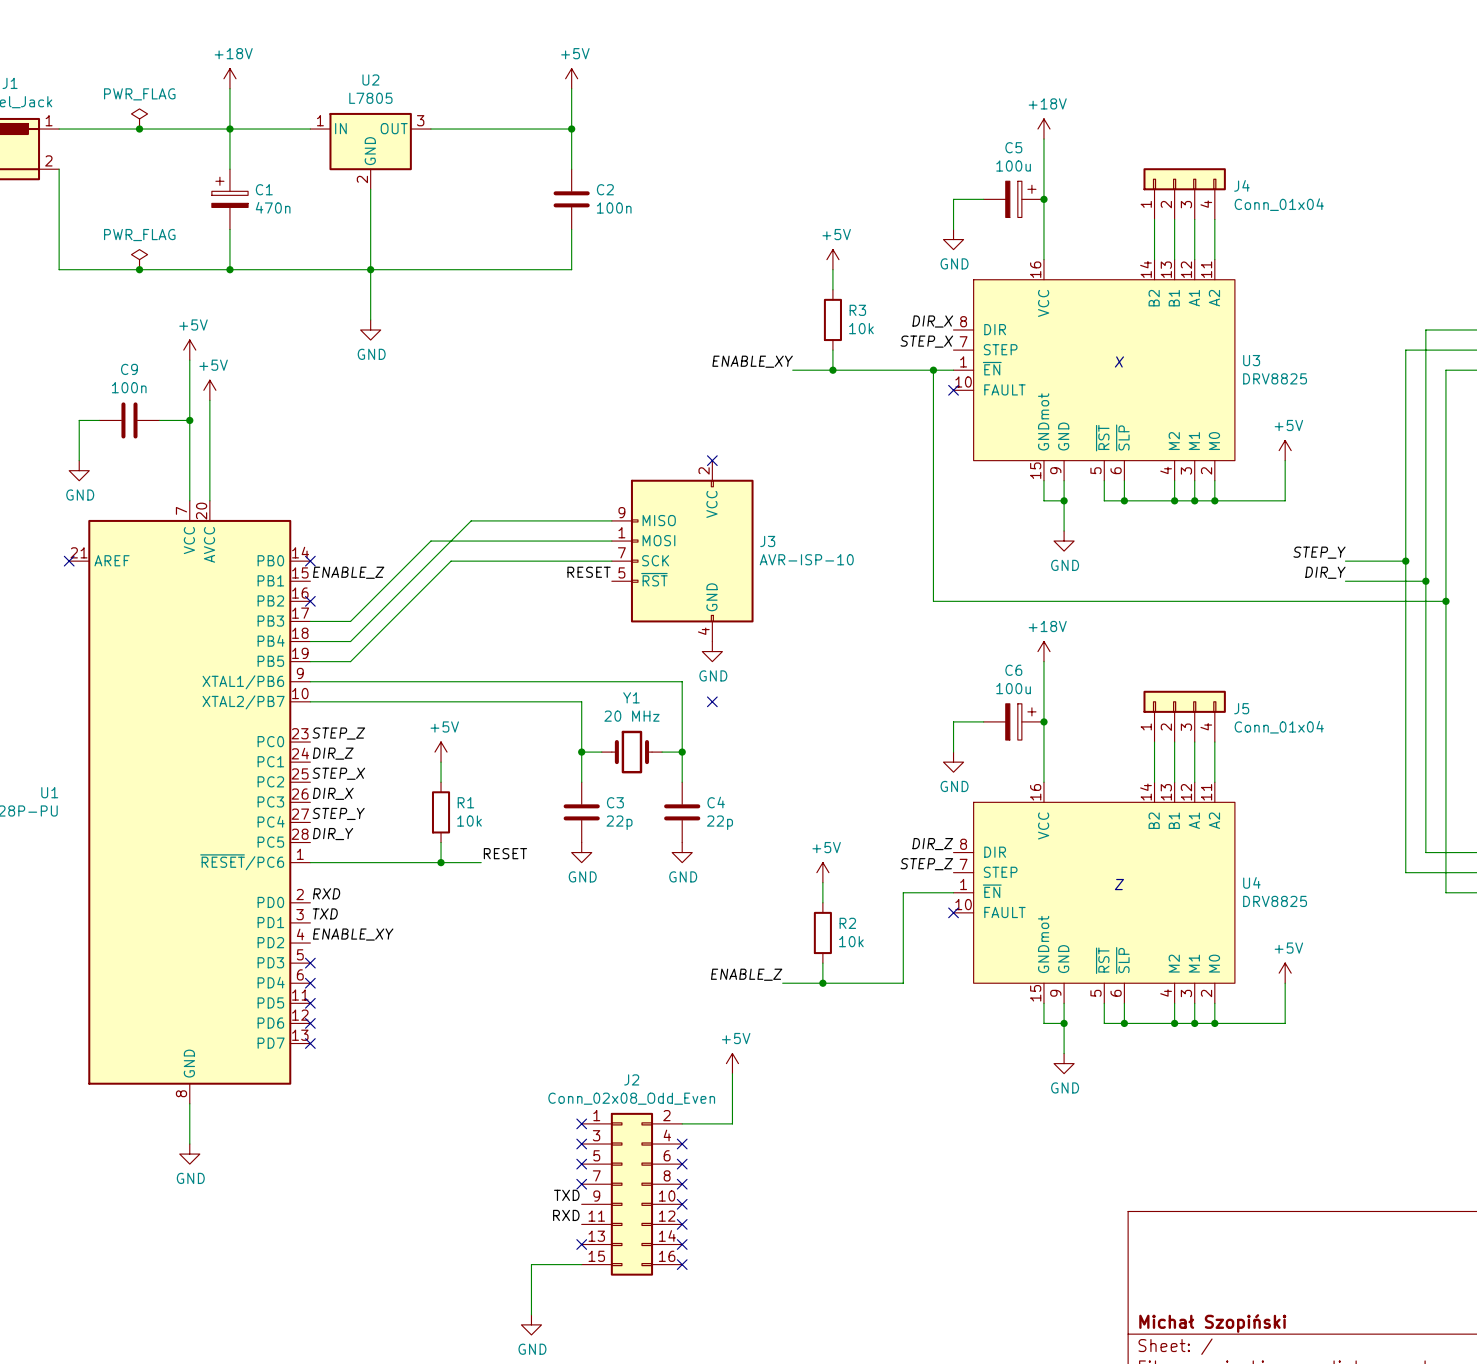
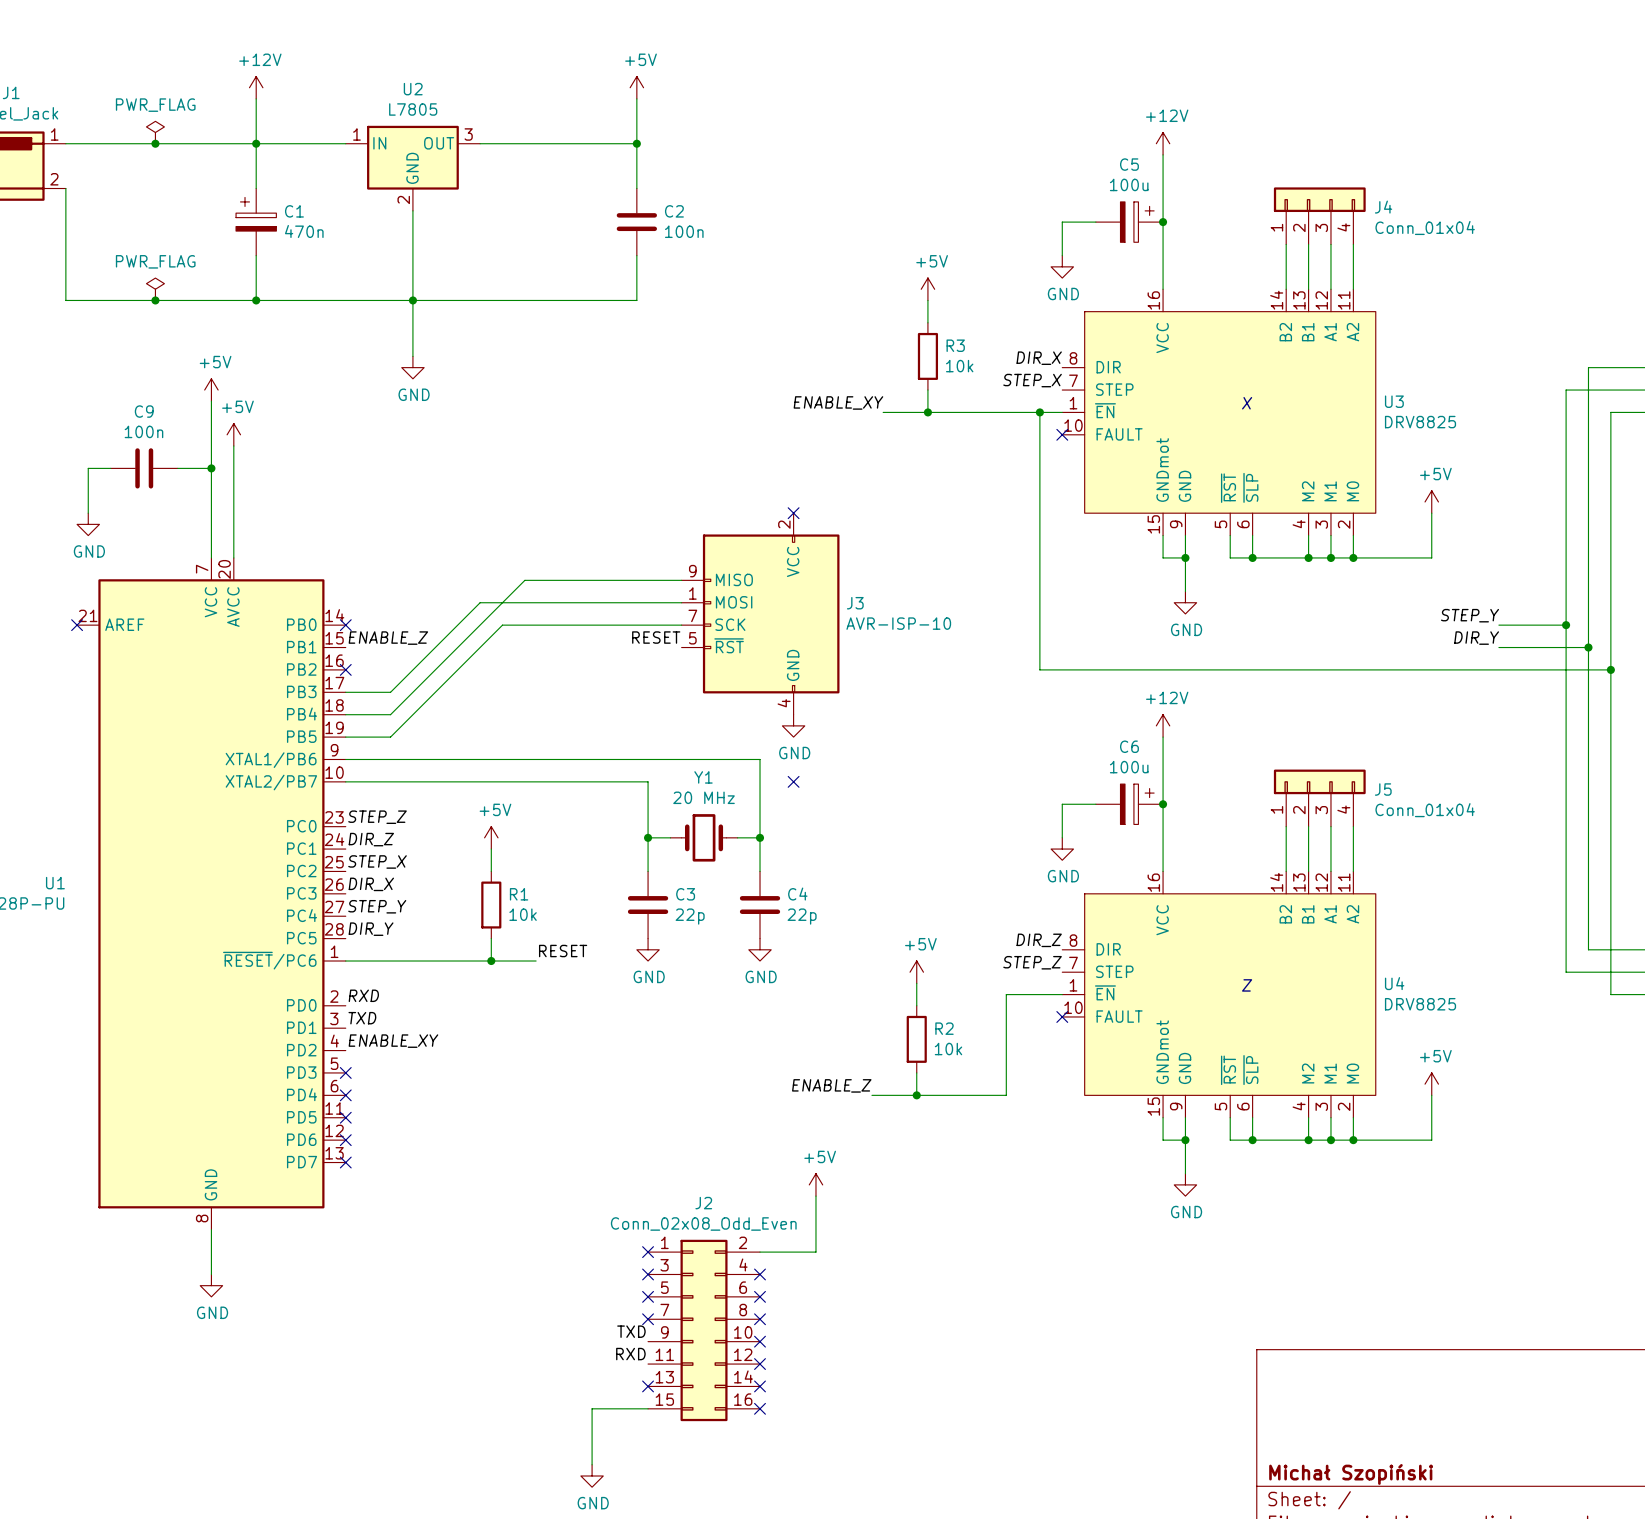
power symbol: +18V (229, 78) -> +12V (256, 87)
power symbol: +18V (1043, 129) -> +12V (1163, 143)
power symbol: +18V (1043, 651) -> +12V (1163, 725)

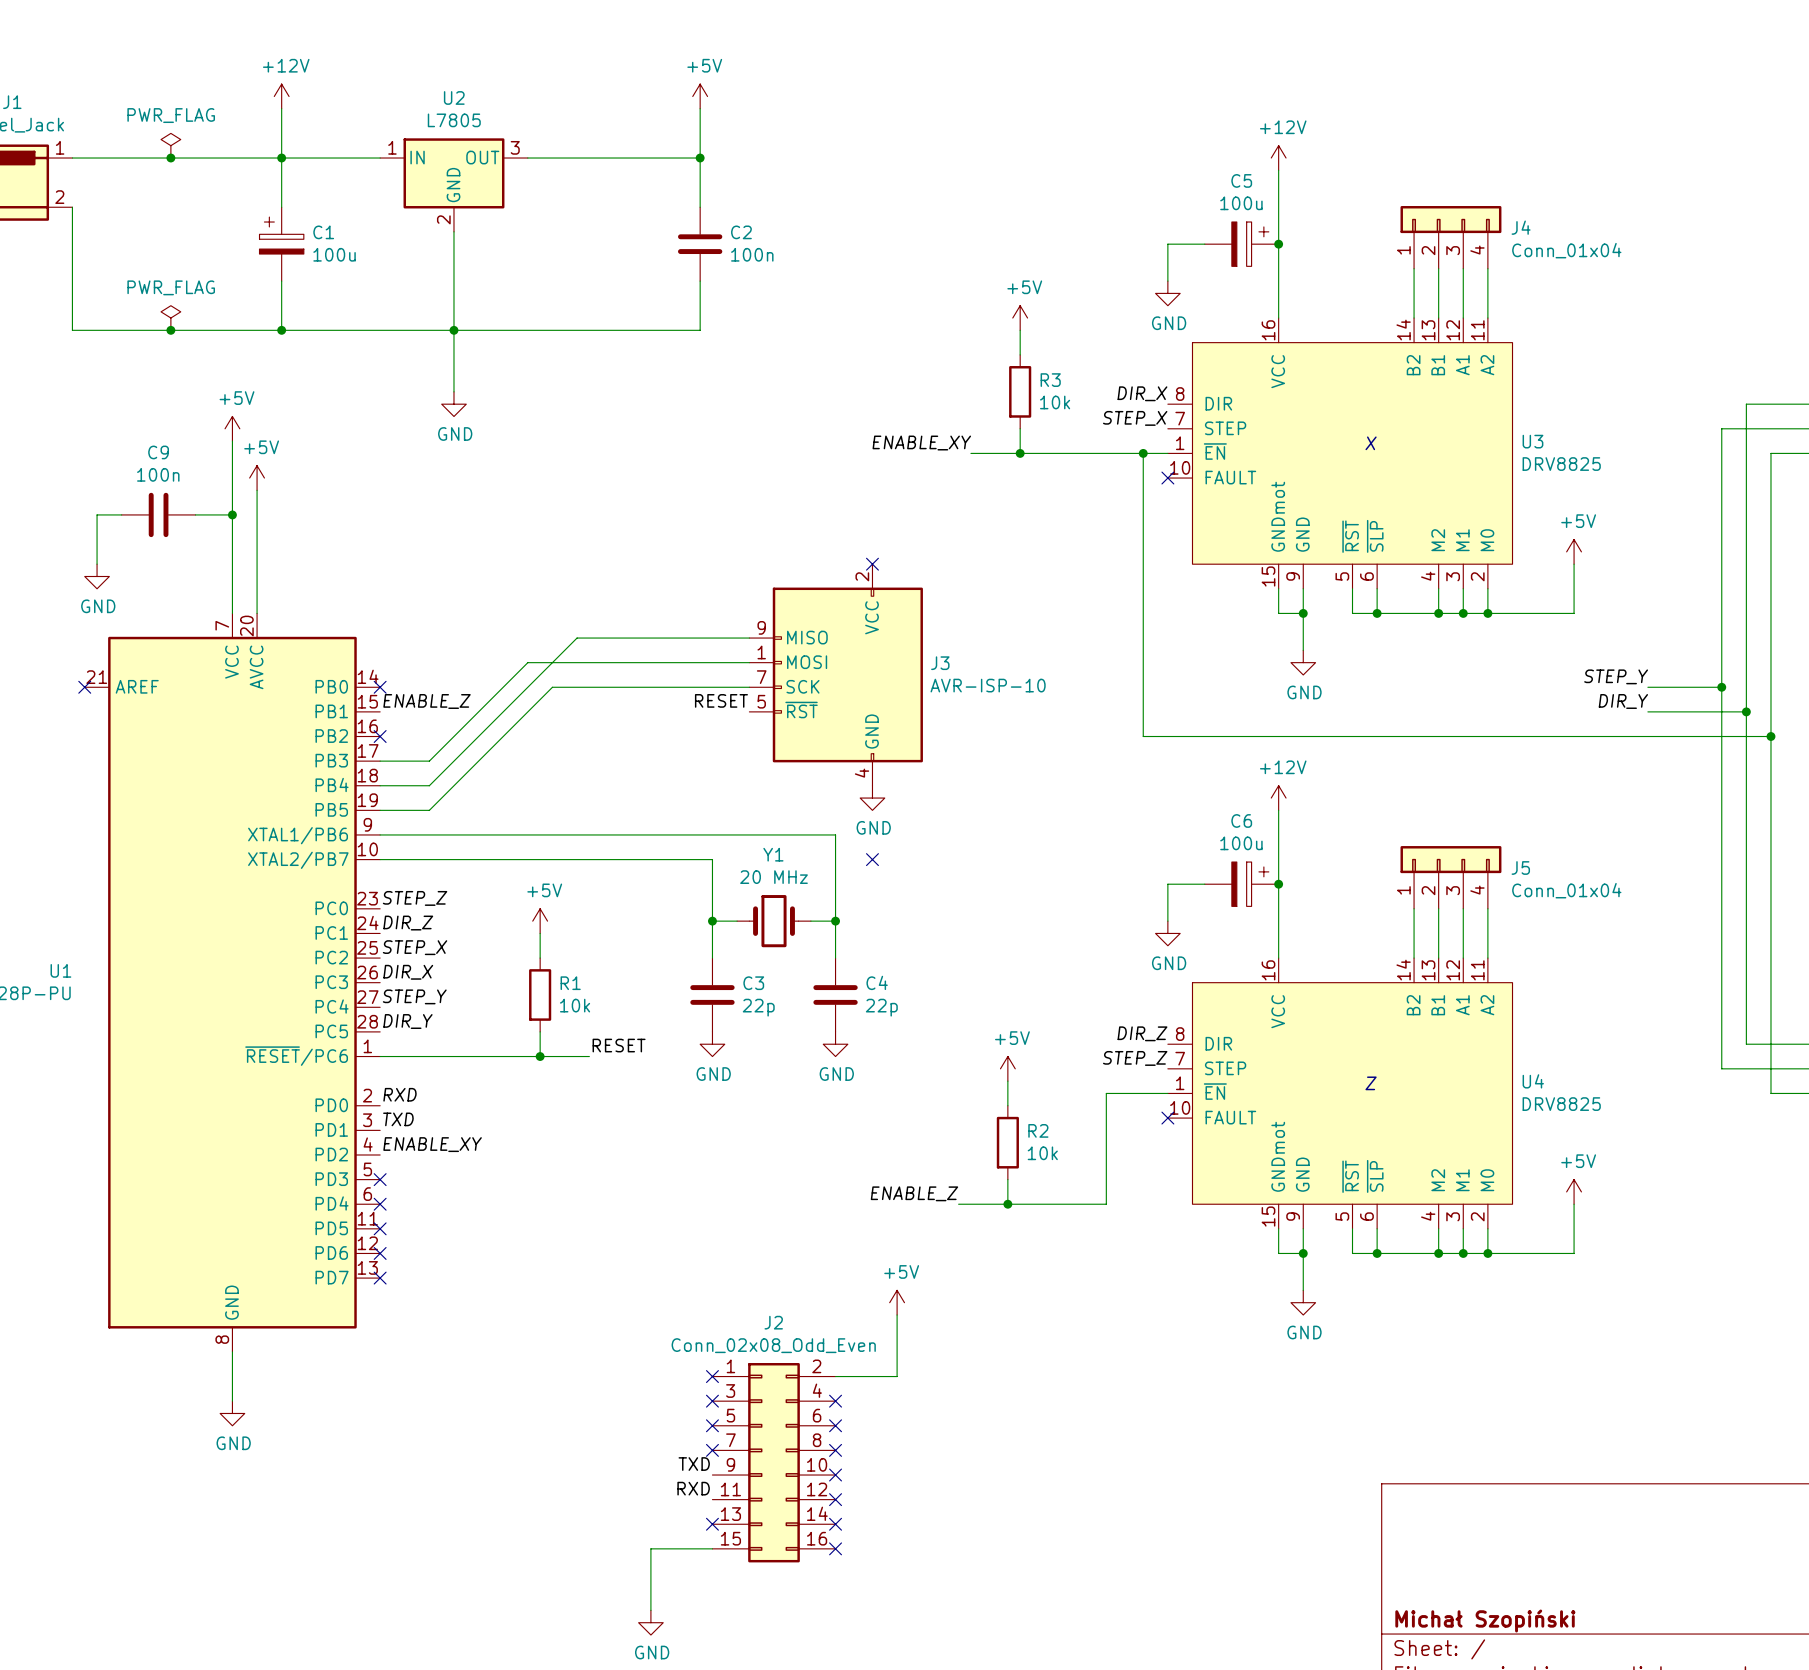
C1 value: 470n (304, 231) -> 100u (334, 254)

